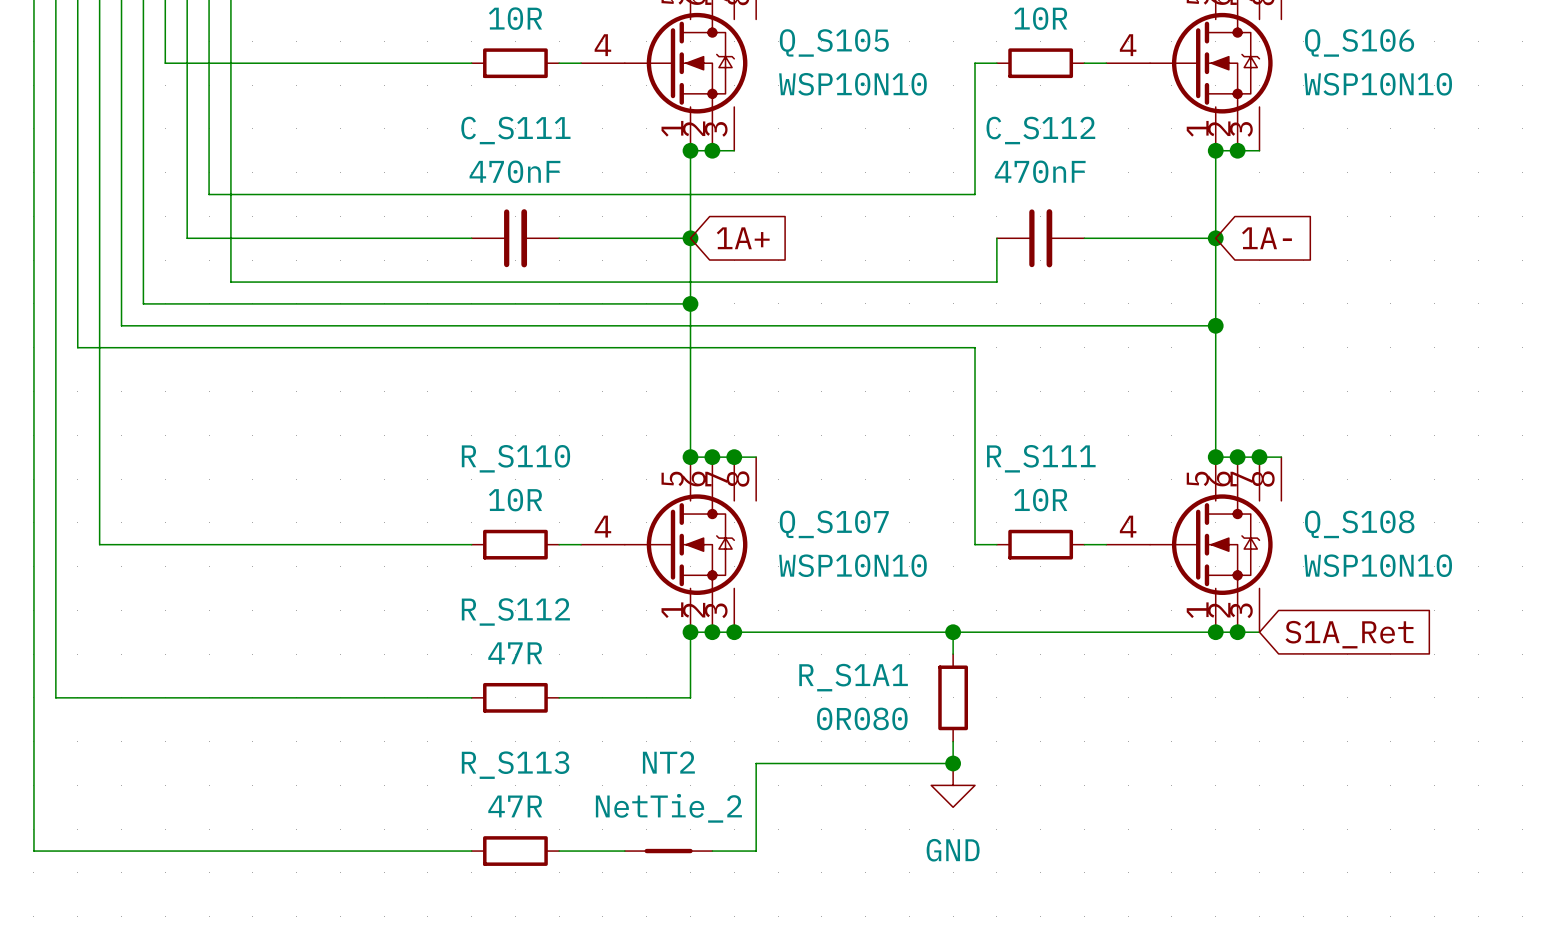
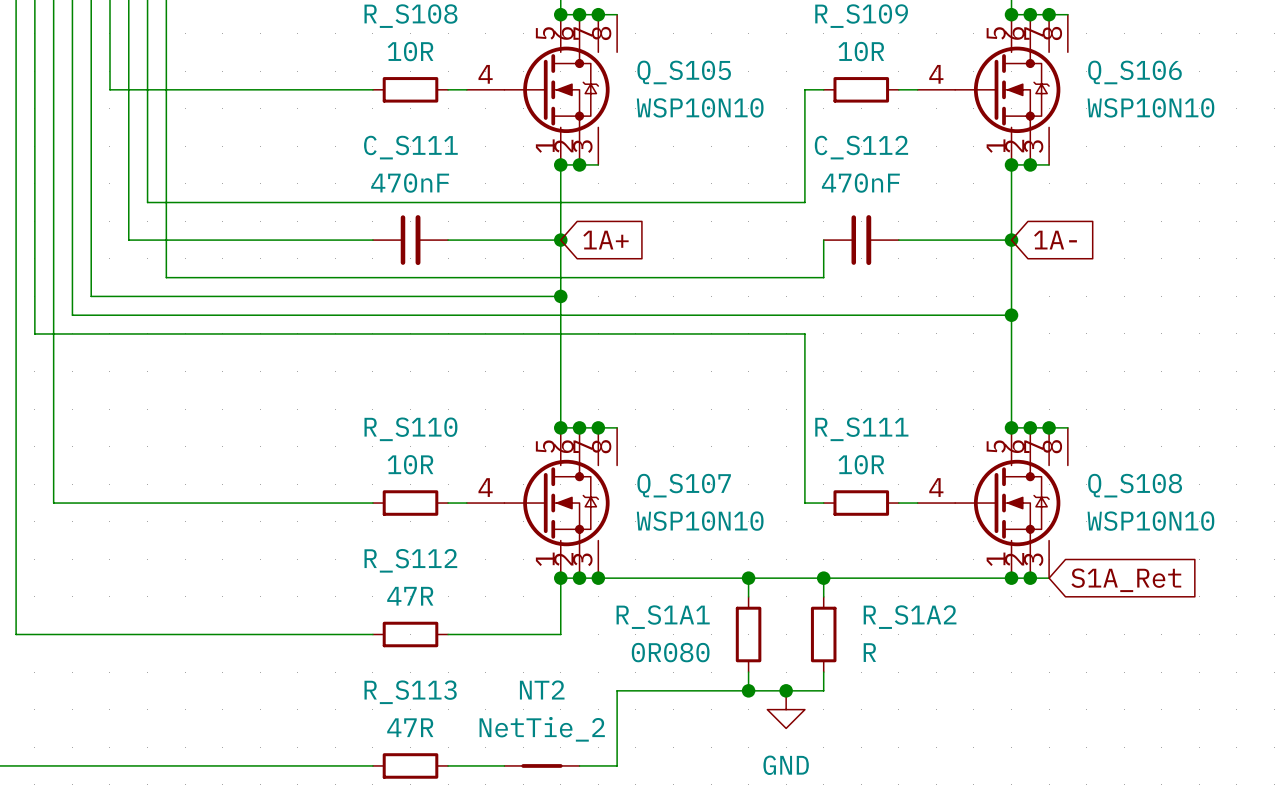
junction: none -> (748, 578)
wire: (953, 632) (953, 654) -> (748, 578) (748, 596)
junction: (953, 632) -> none
wire: none -> (823, 578) (823, 596)
junction: none -> (823, 578)
R_S1A1 position: (953, 697) -> (748, 634)
R_S1A2: none -> R (823, 634)
wire: none -> (748, 672) (748, 690)
wire: (953, 741) (953, 763) -> (823, 672) (823, 690) (786, 690)
junction: none -> (748, 690)

